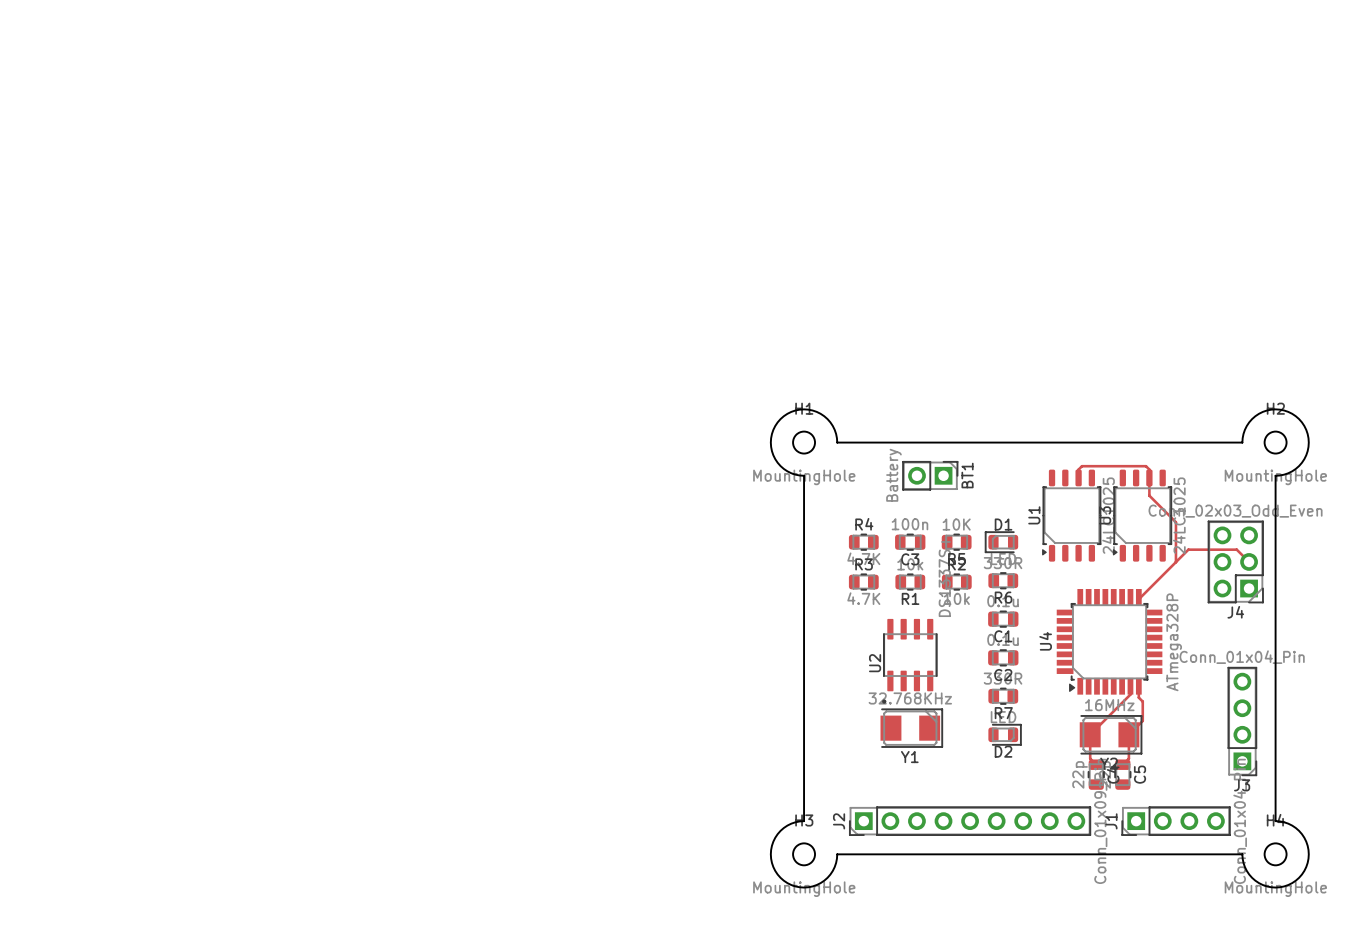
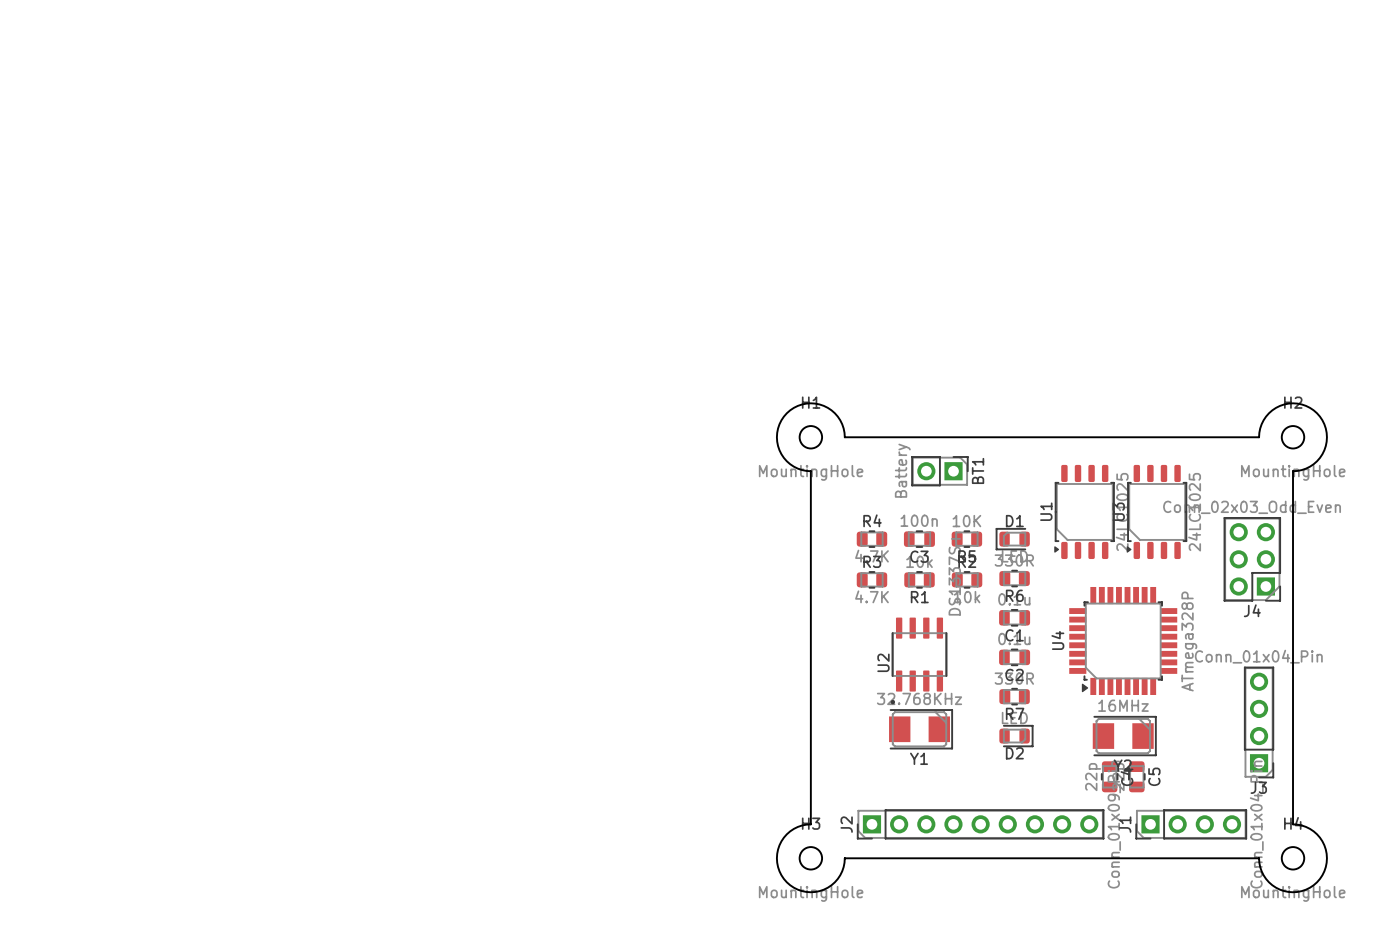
track: (1078, 477) (1078, 469) (1081, 466) (1146, 466) (1149, 469) (1149, 495) (1175, 522) (1175, 562) -> none
track: (1249, 561) (1236, 549) (1188, 549) (1138, 597) -> none
track: (1130, 686) (1130, 694) (1090, 734) (1090, 758) (1096, 764) -> none
track: (1138, 686) (1138, 697) (1142, 701) (1142, 720) (1128, 734) (1128, 758) (1122, 764) -> none

